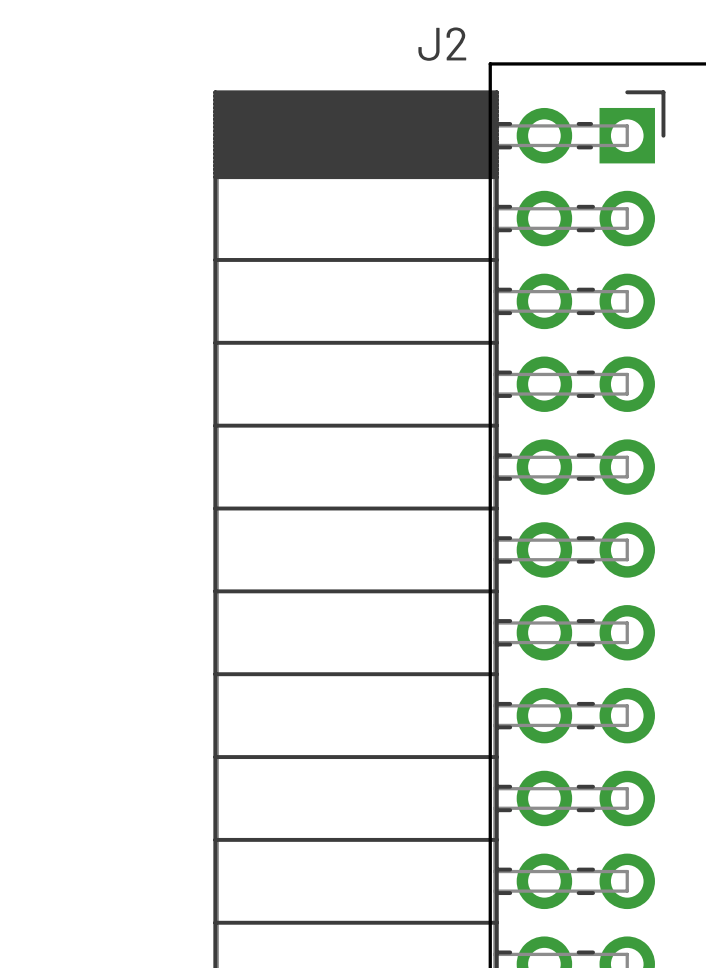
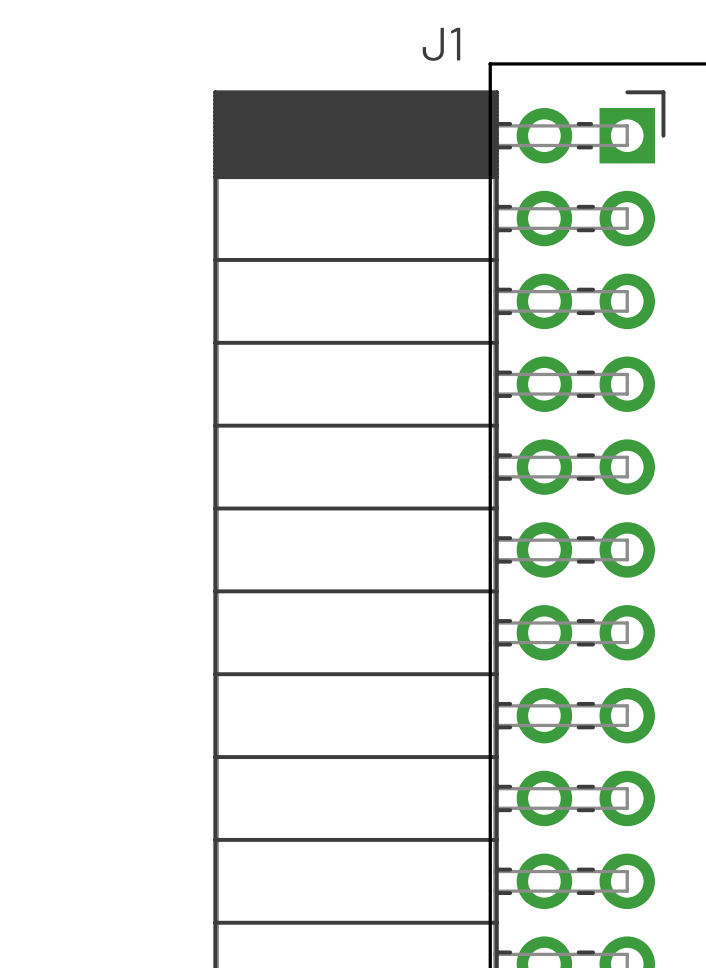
J2 name: J2 (442, 44) -> J1 (441, 44)

